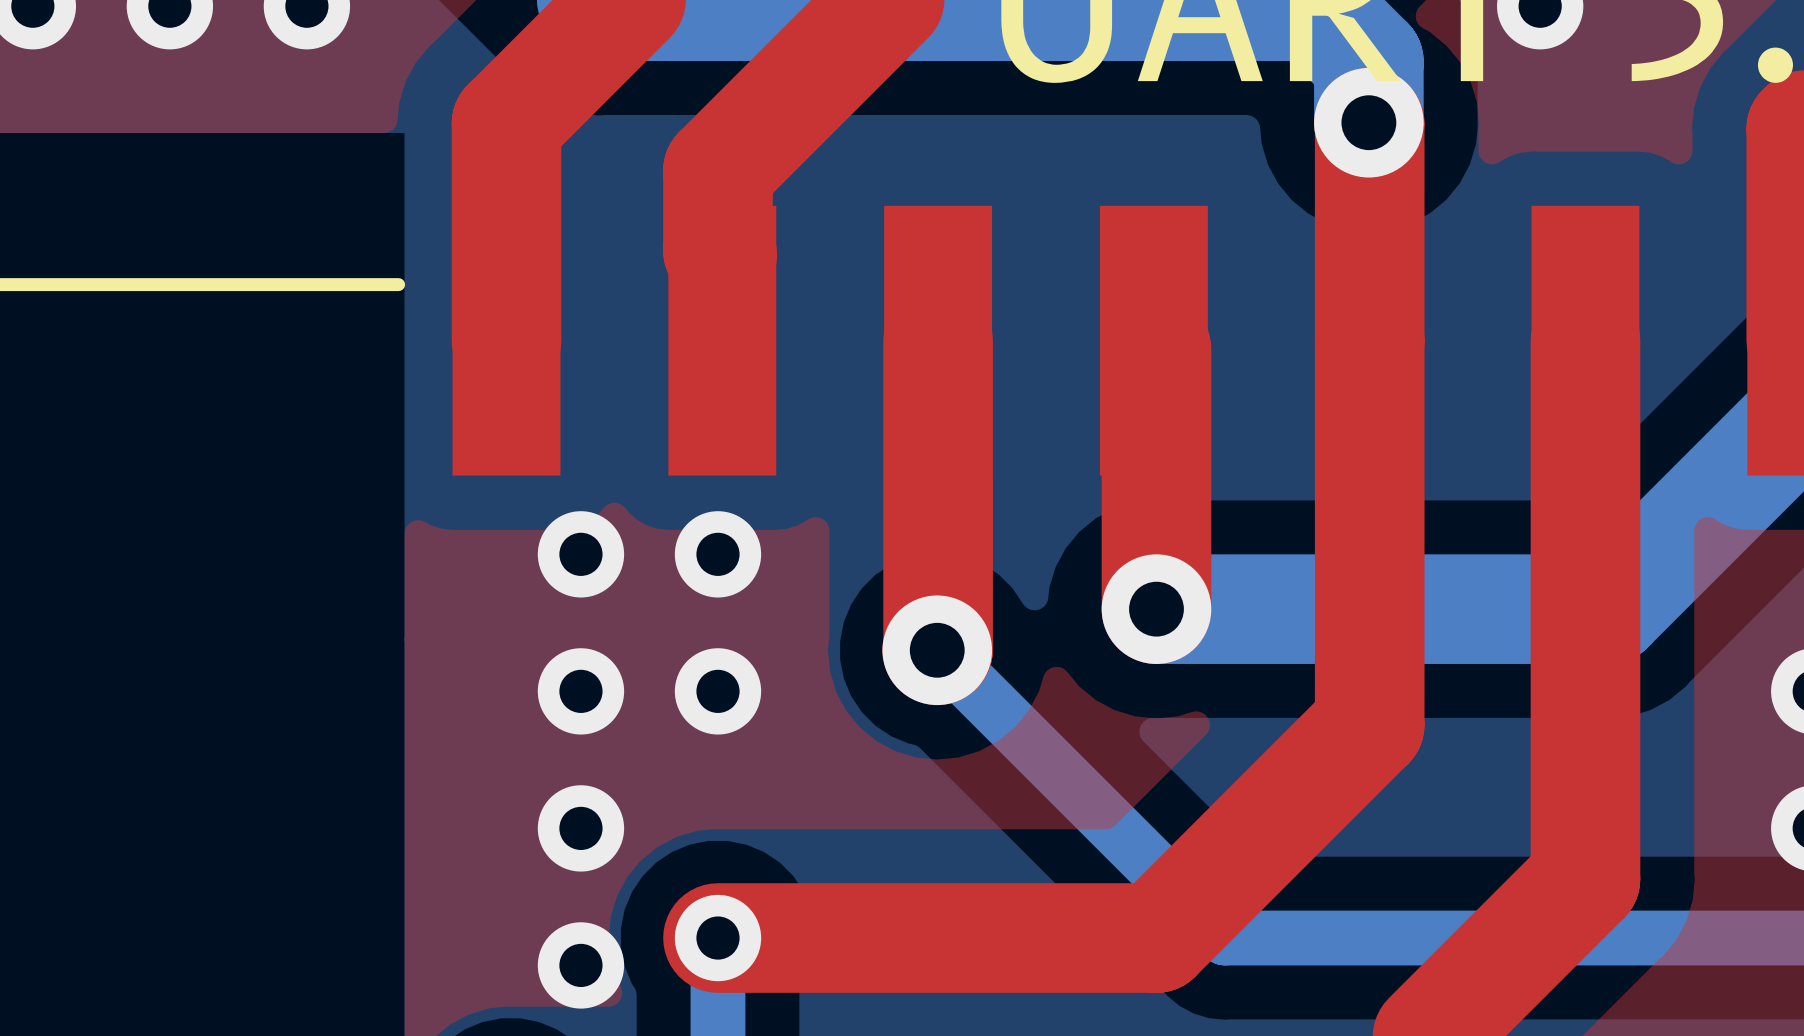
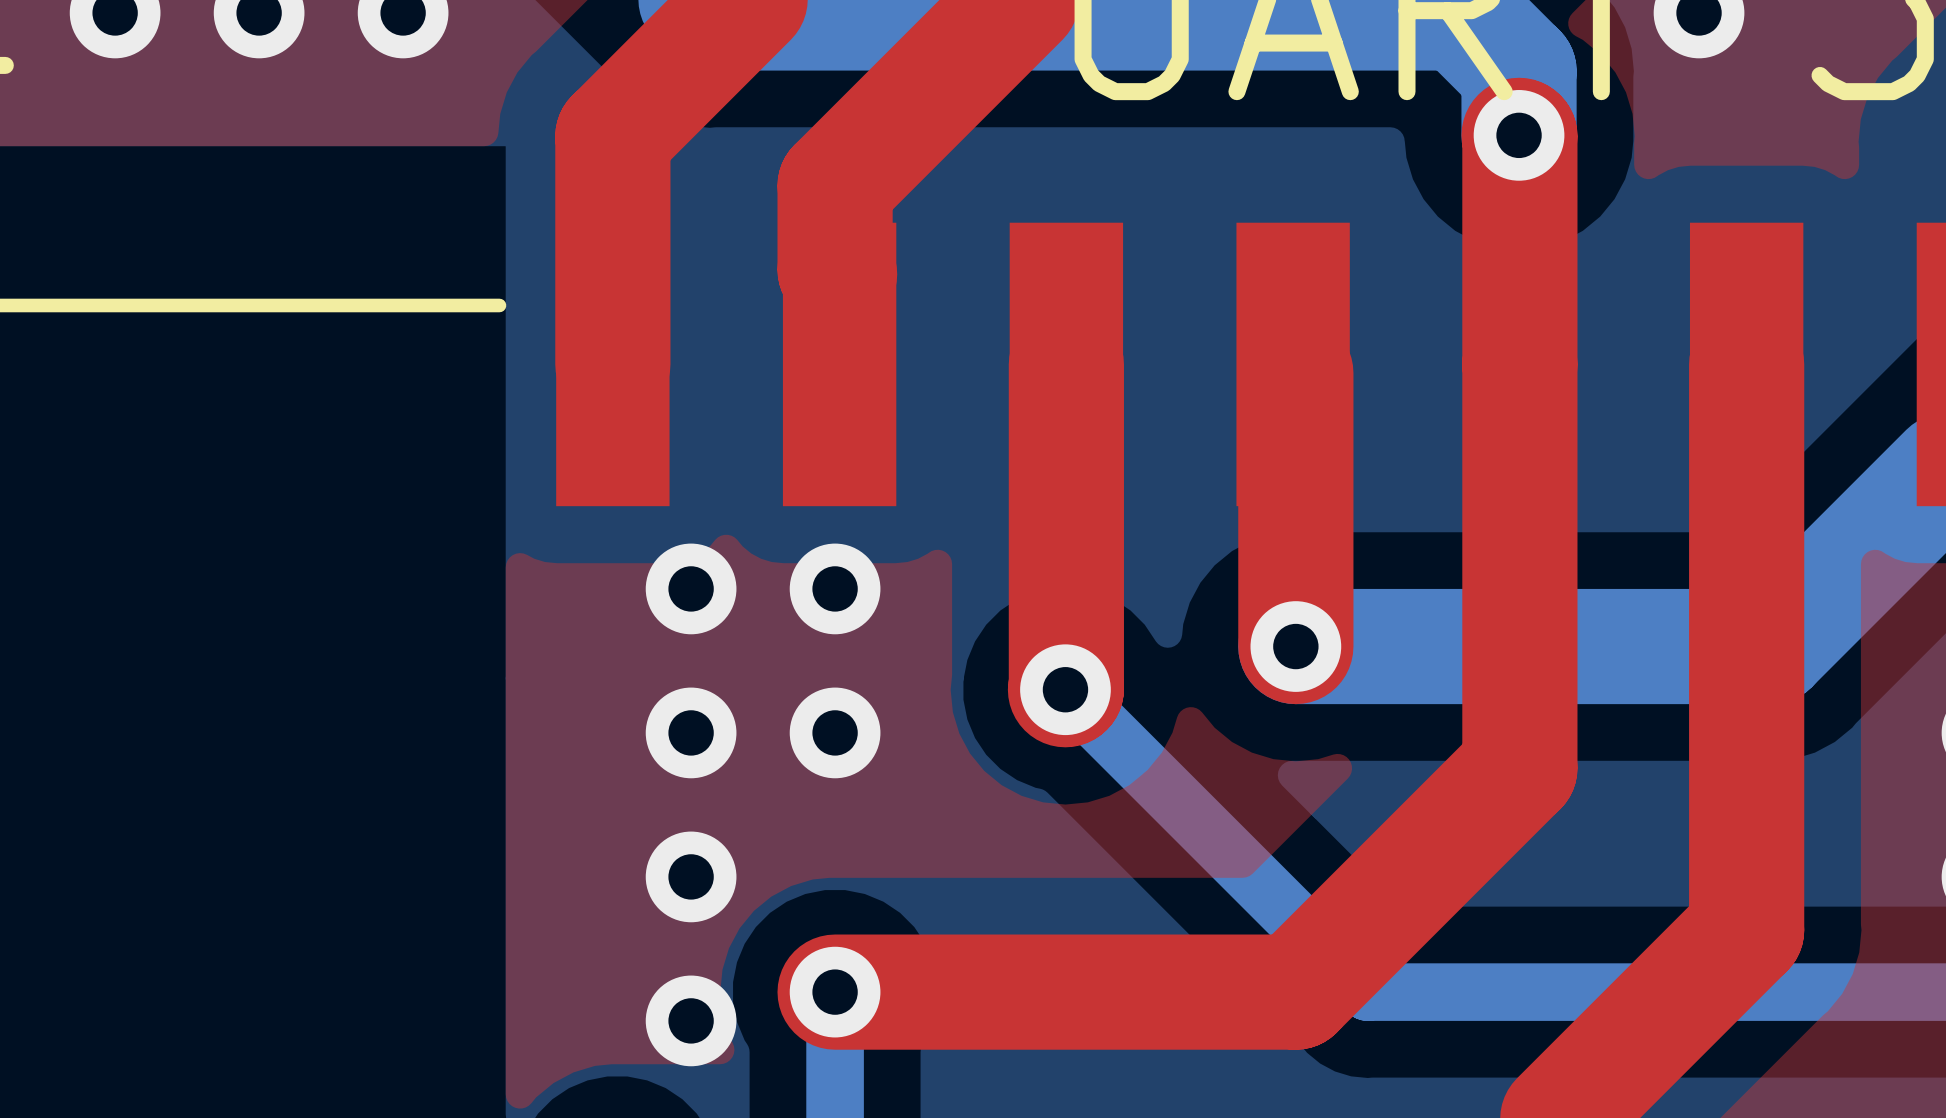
via size: [1314, 67, 1424, 178] -> [1473, 90, 1565, 181]
via size: [1101, 554, 1212, 664] -> [1250, 601, 1342, 692]
via size: [882, 595, 993, 706] -> [1020, 644, 1111, 736]

